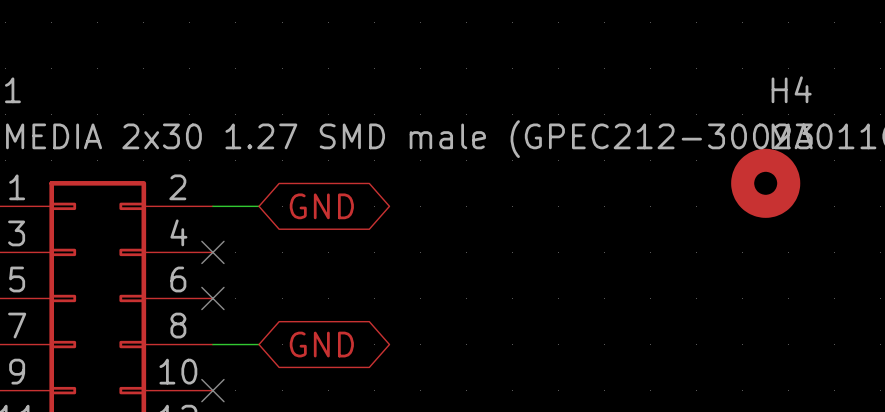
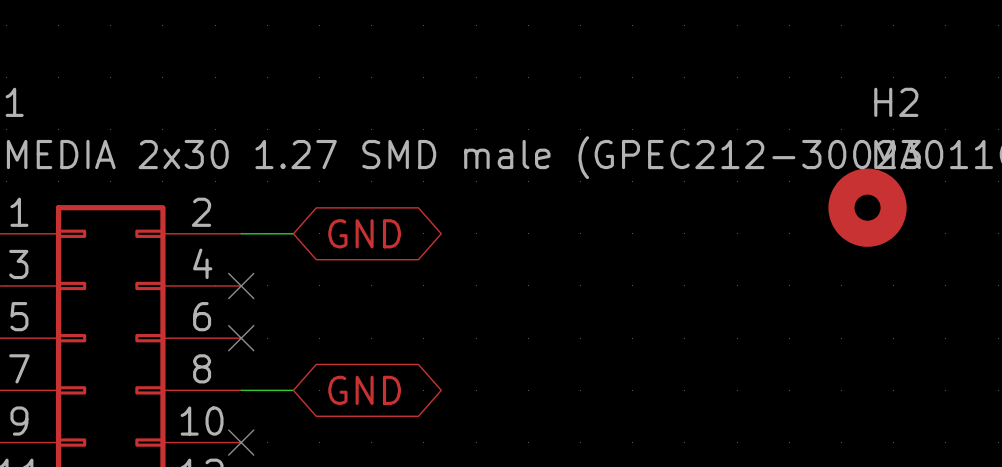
H4 name: H4 (791, 89) -> H2 (896, 102)

